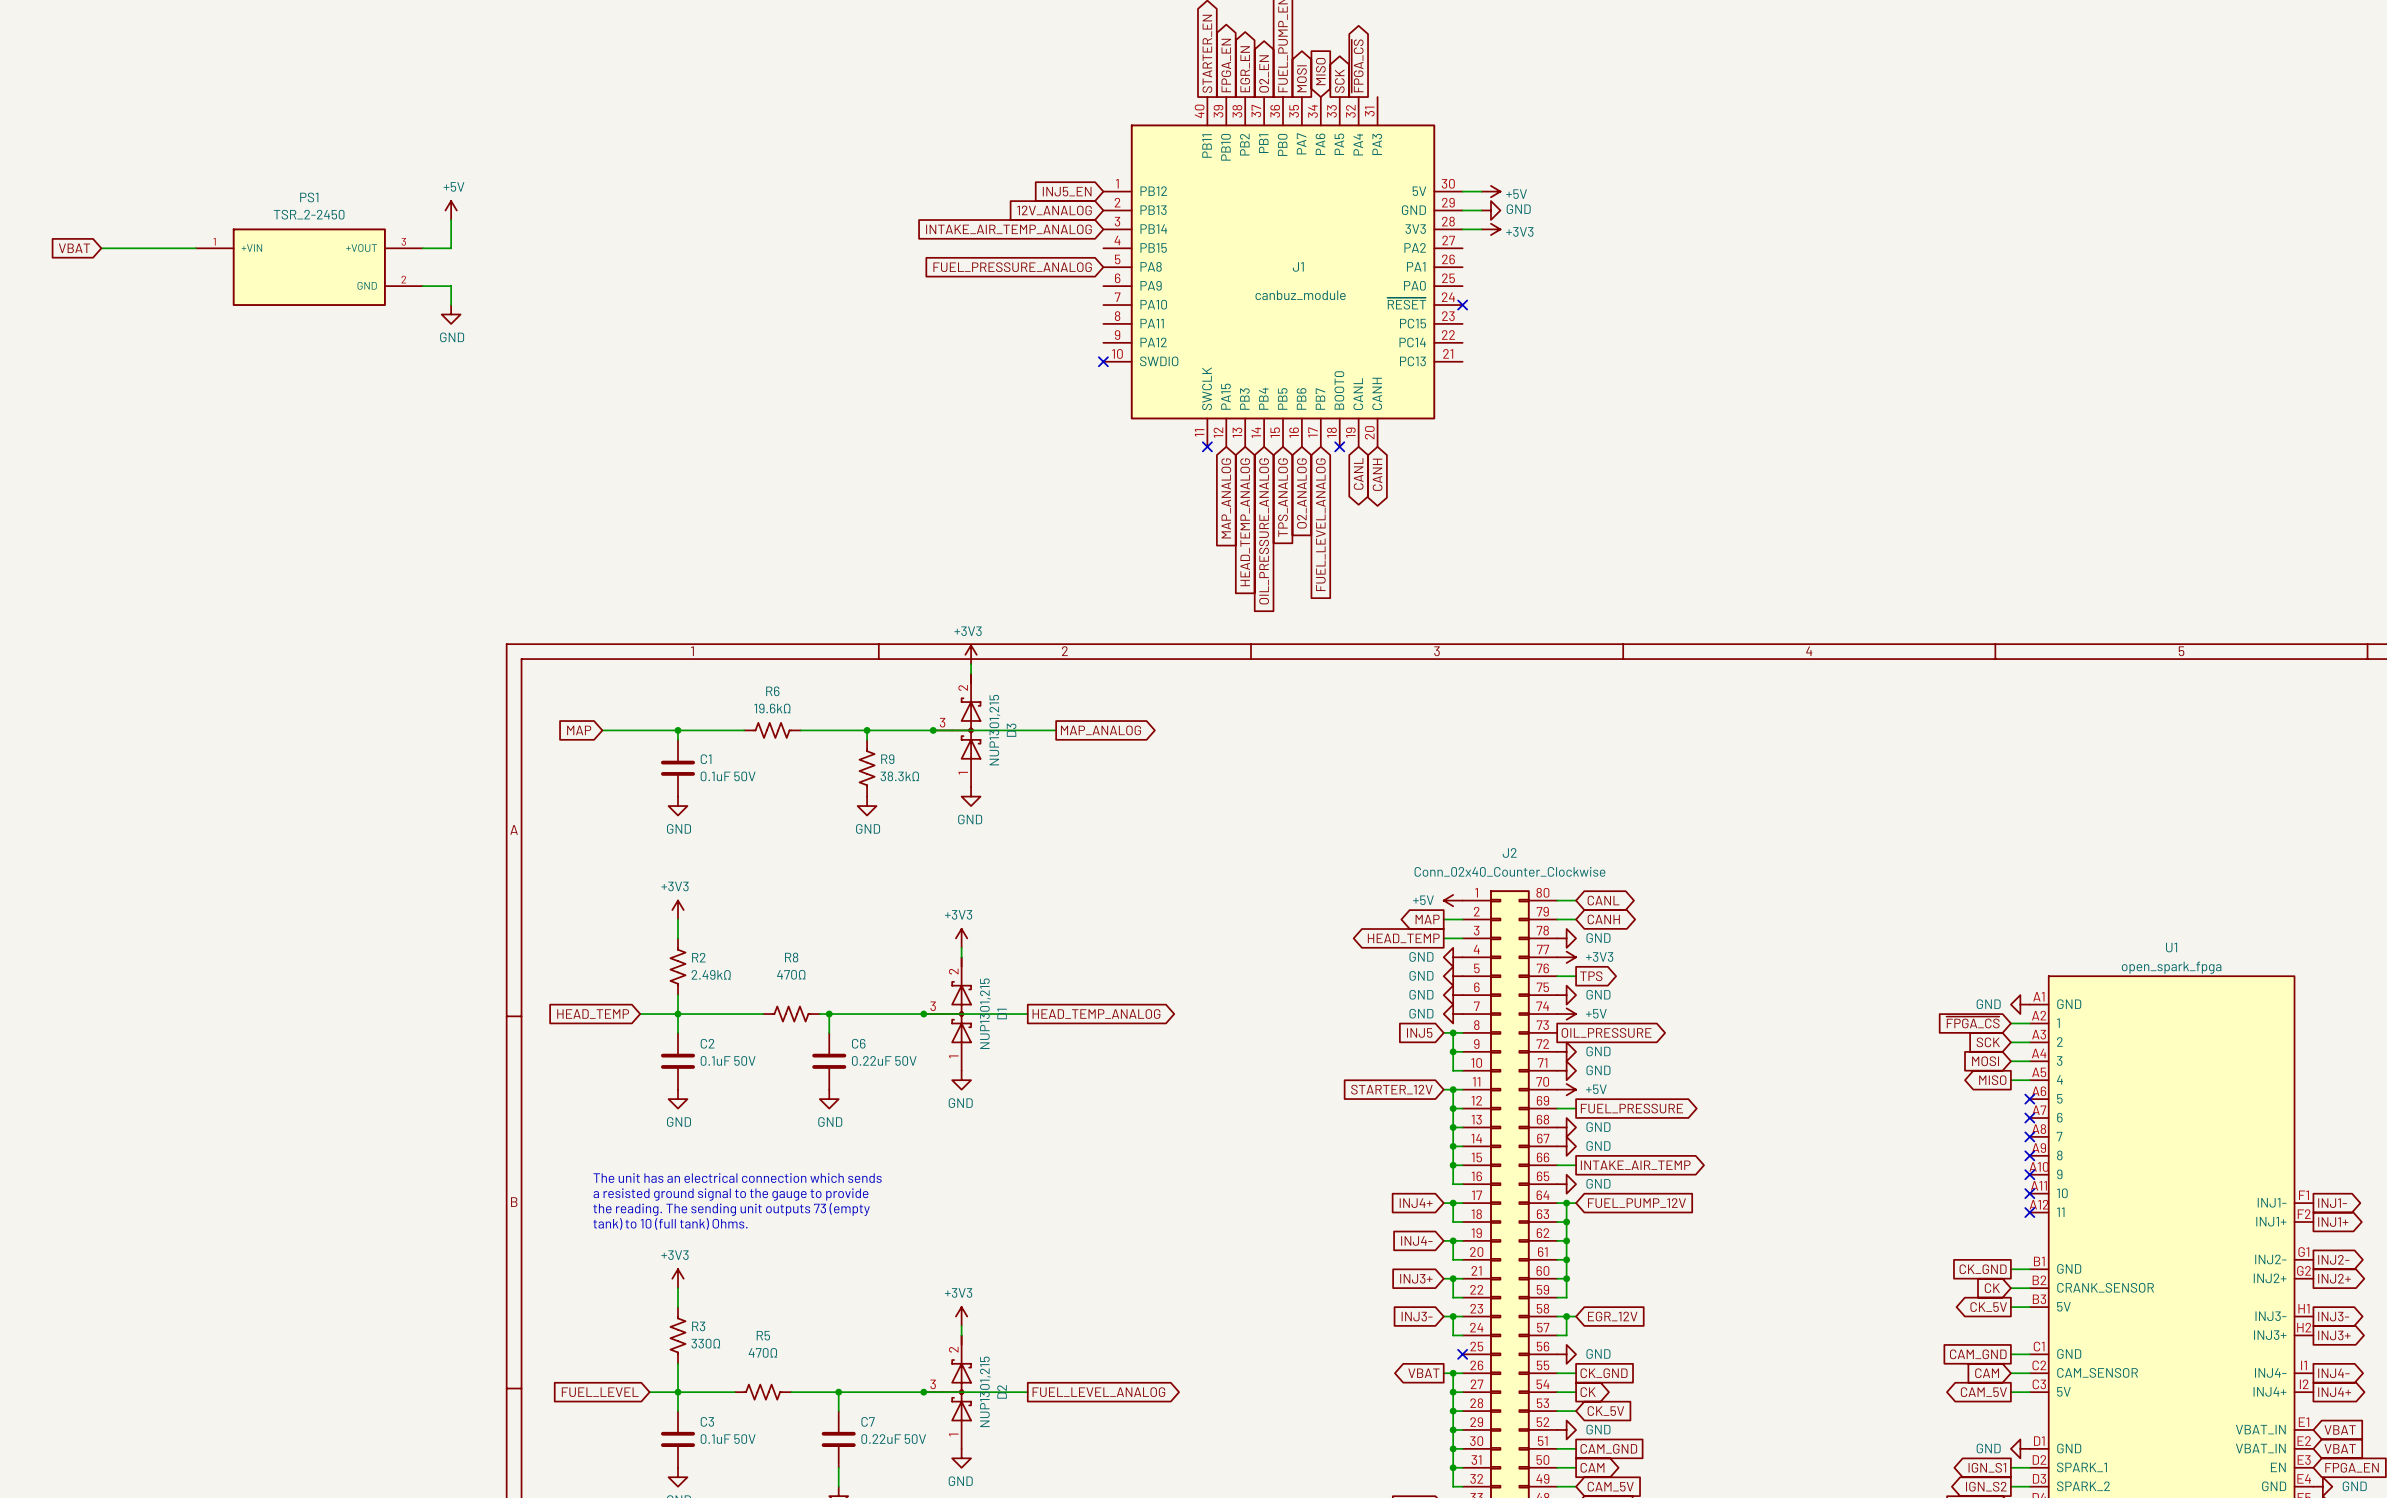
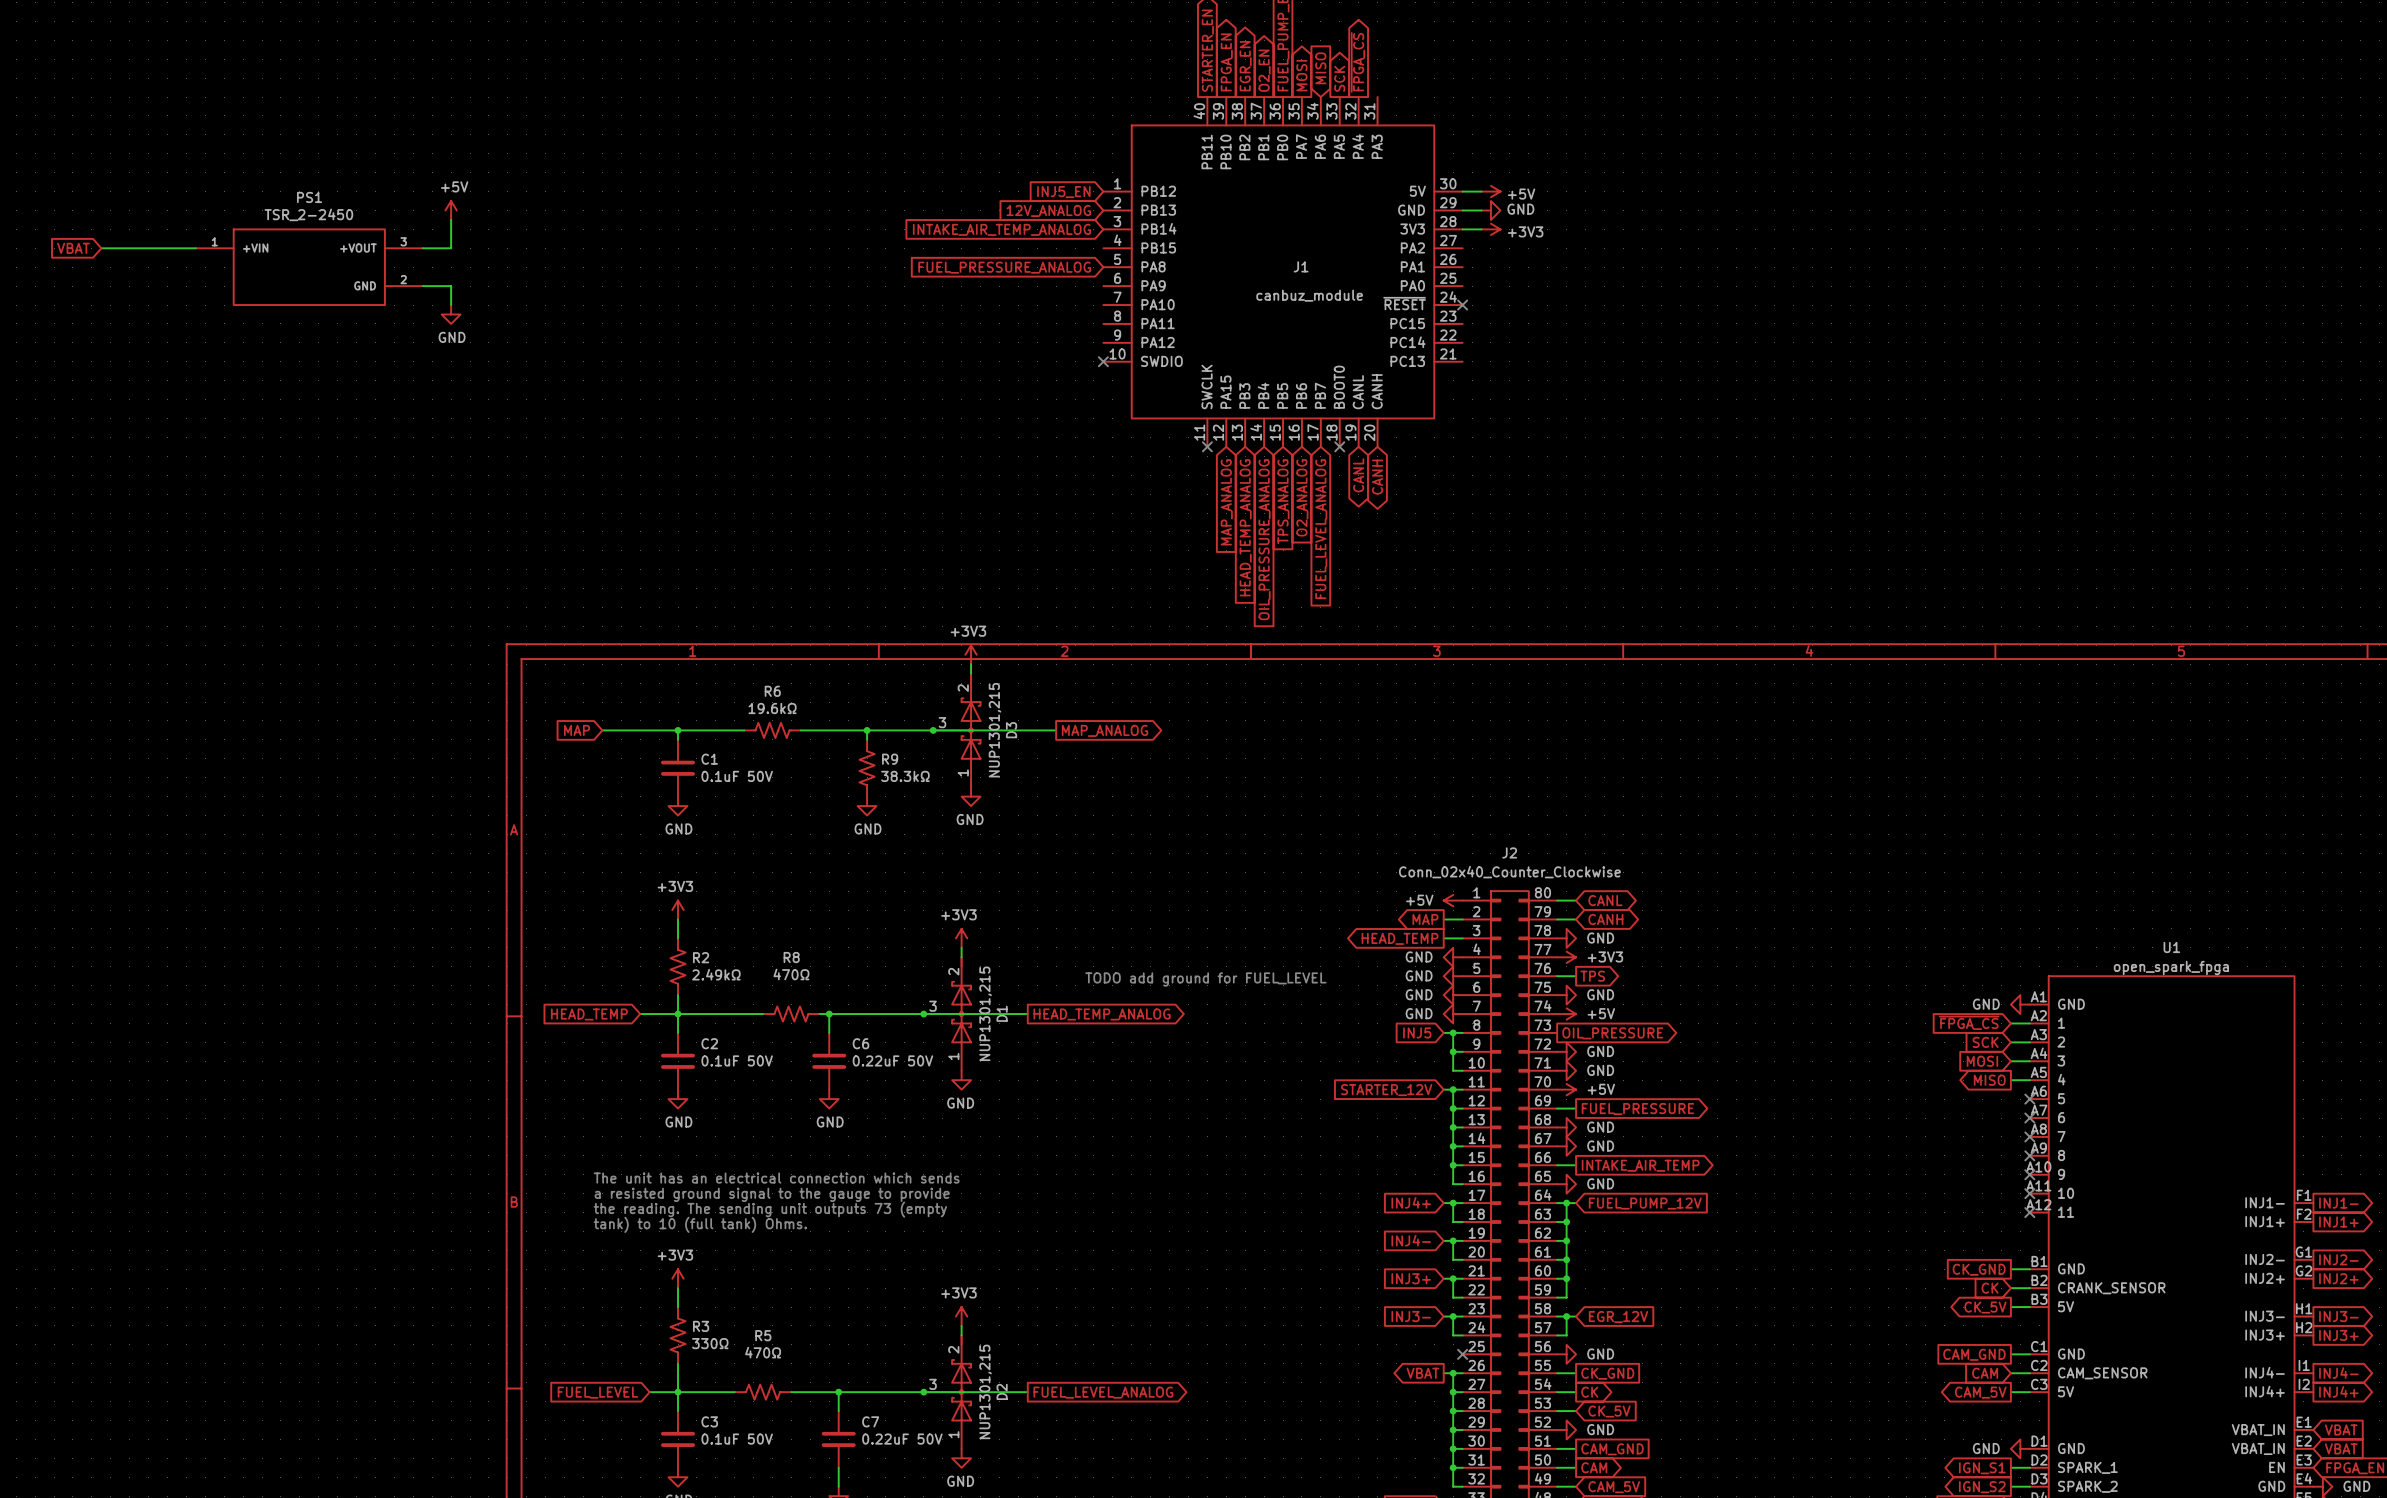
text: none -> TODO add ground for FUEL_LEVEL (1205, 979)

